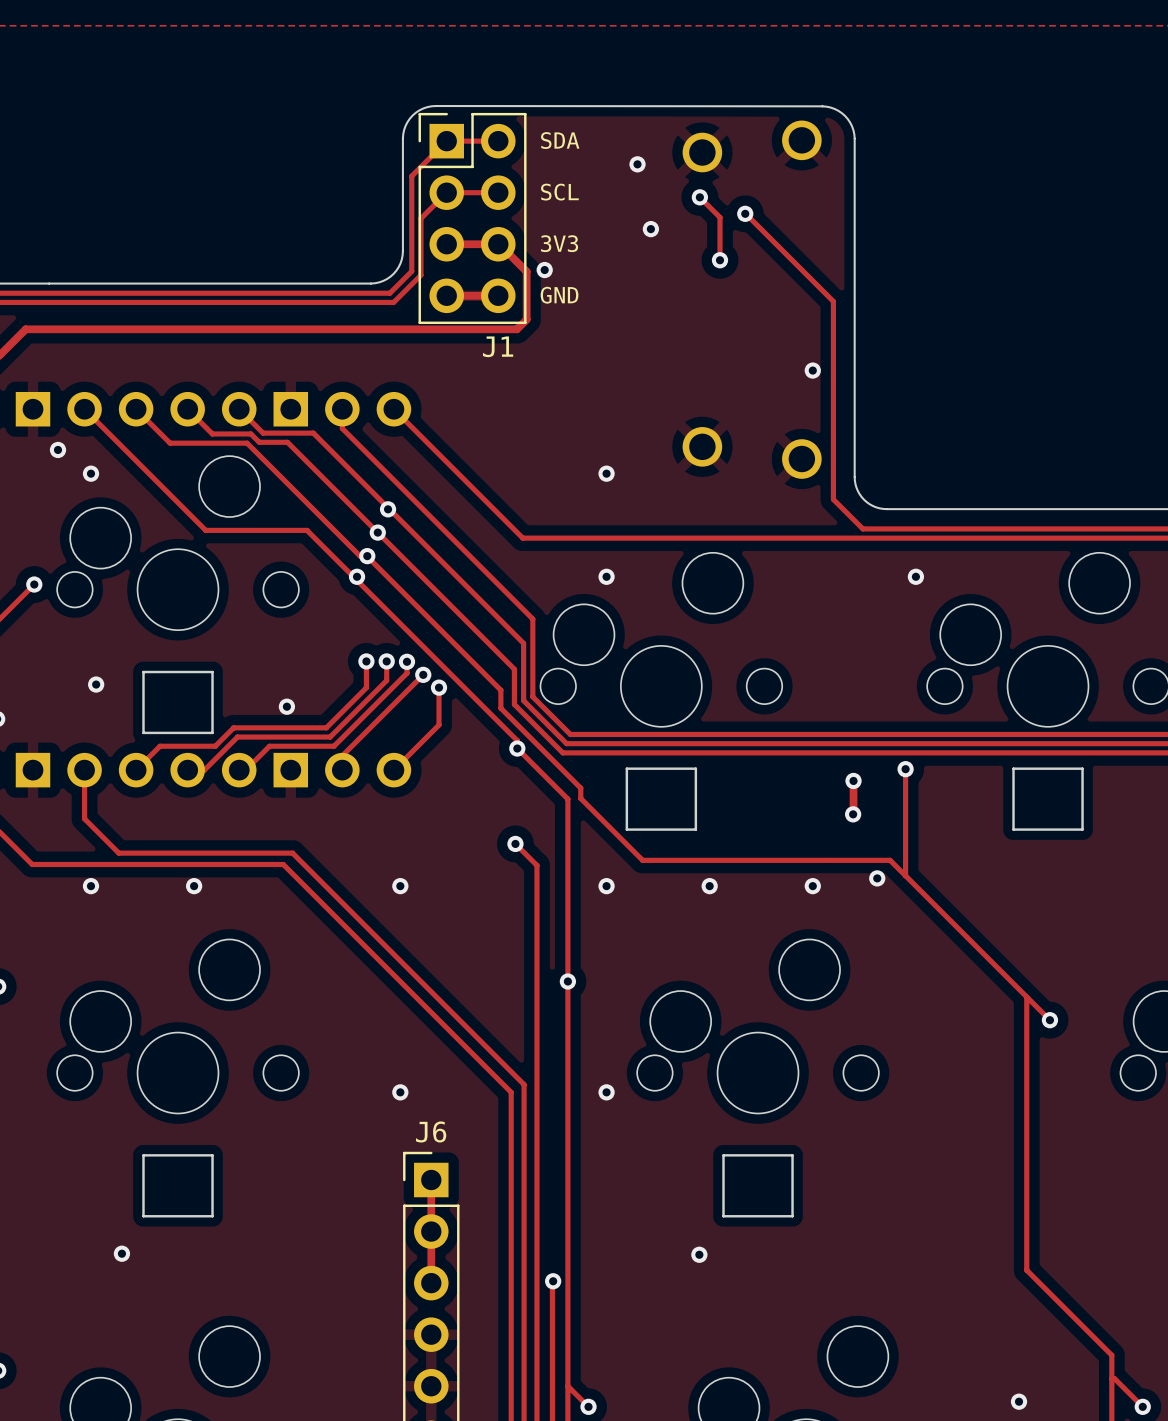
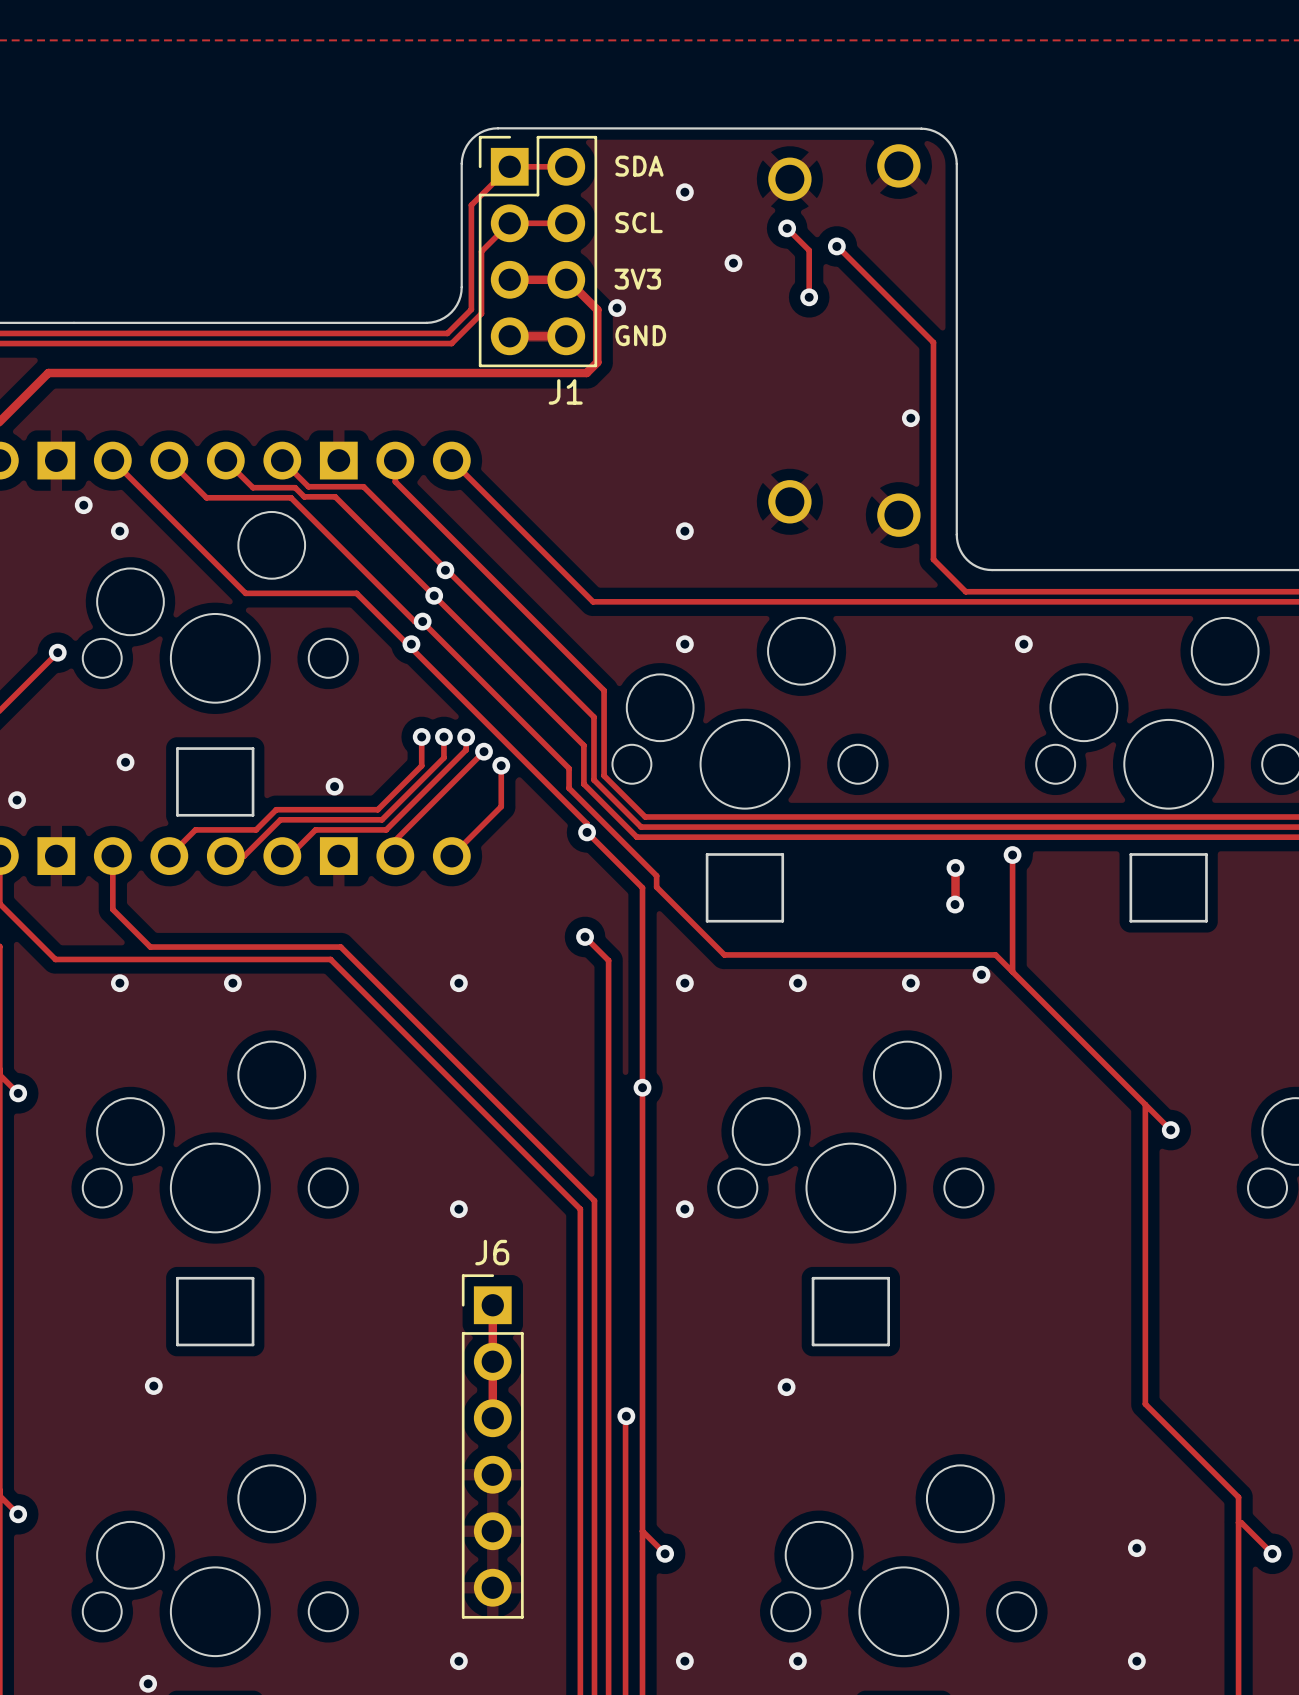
via position: (637, 164) -> (684, 192)

